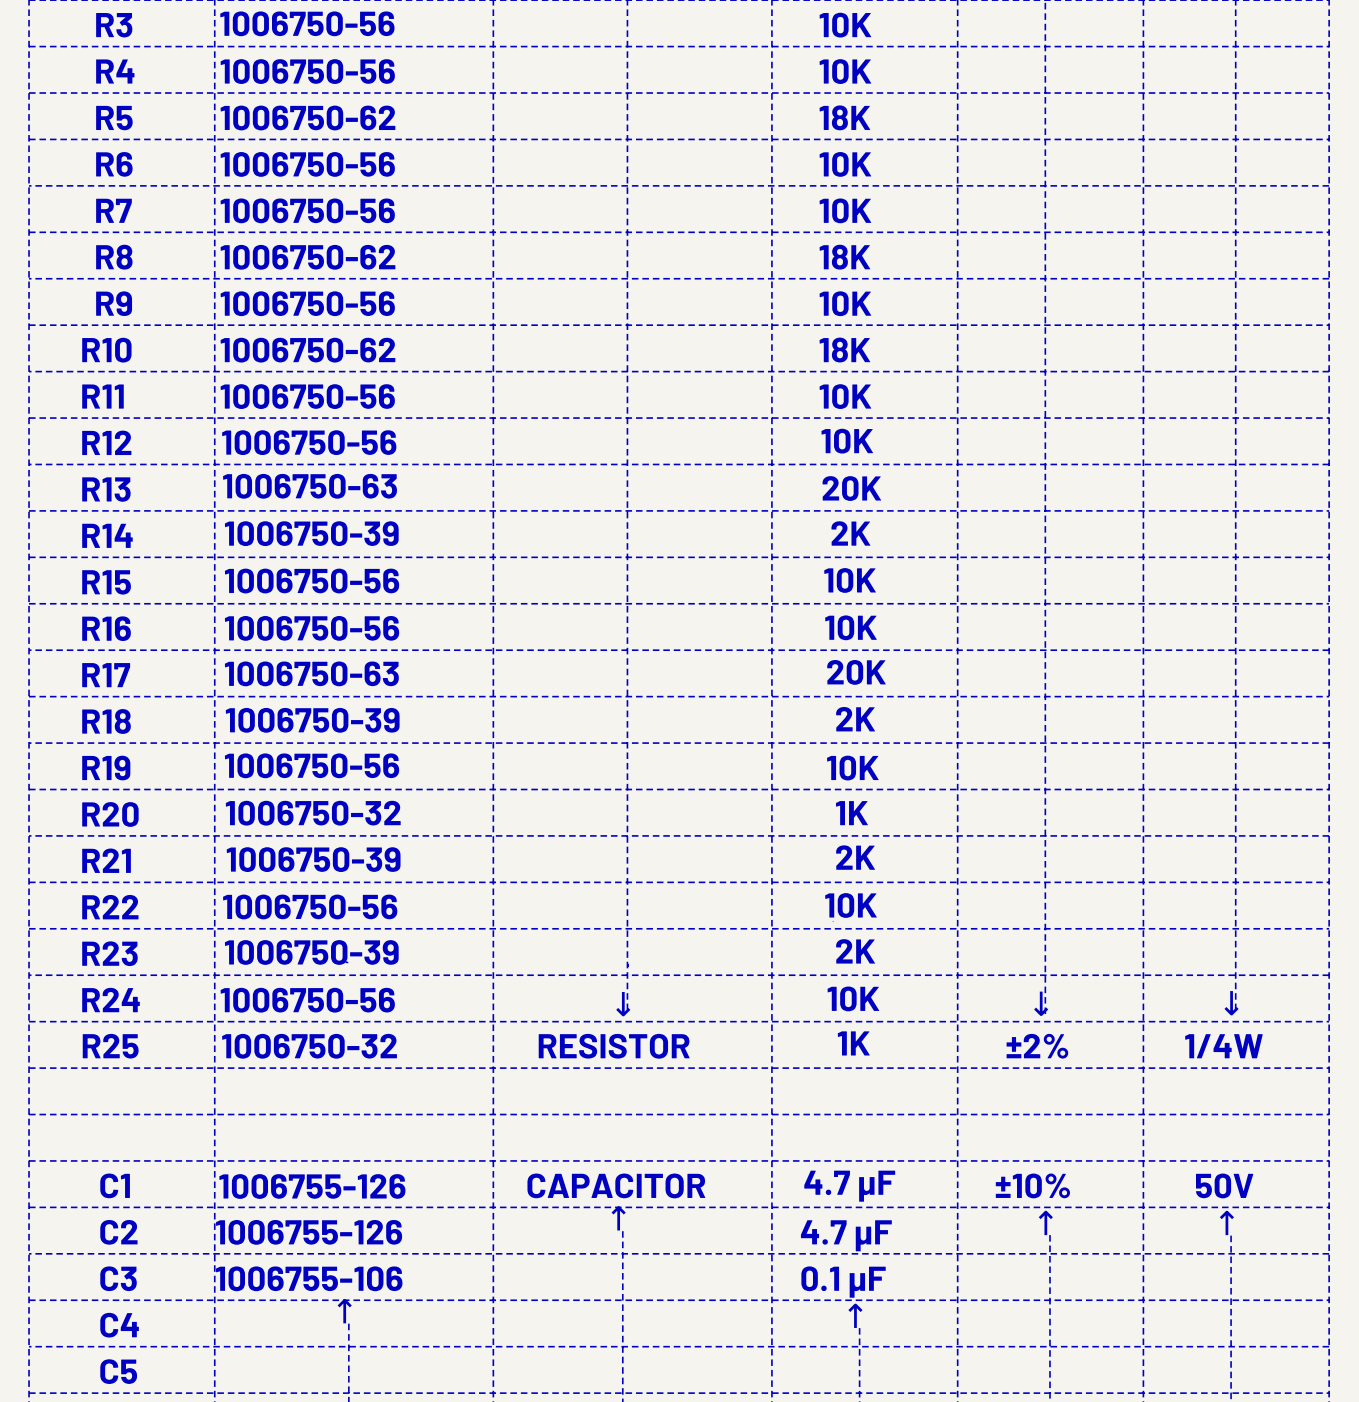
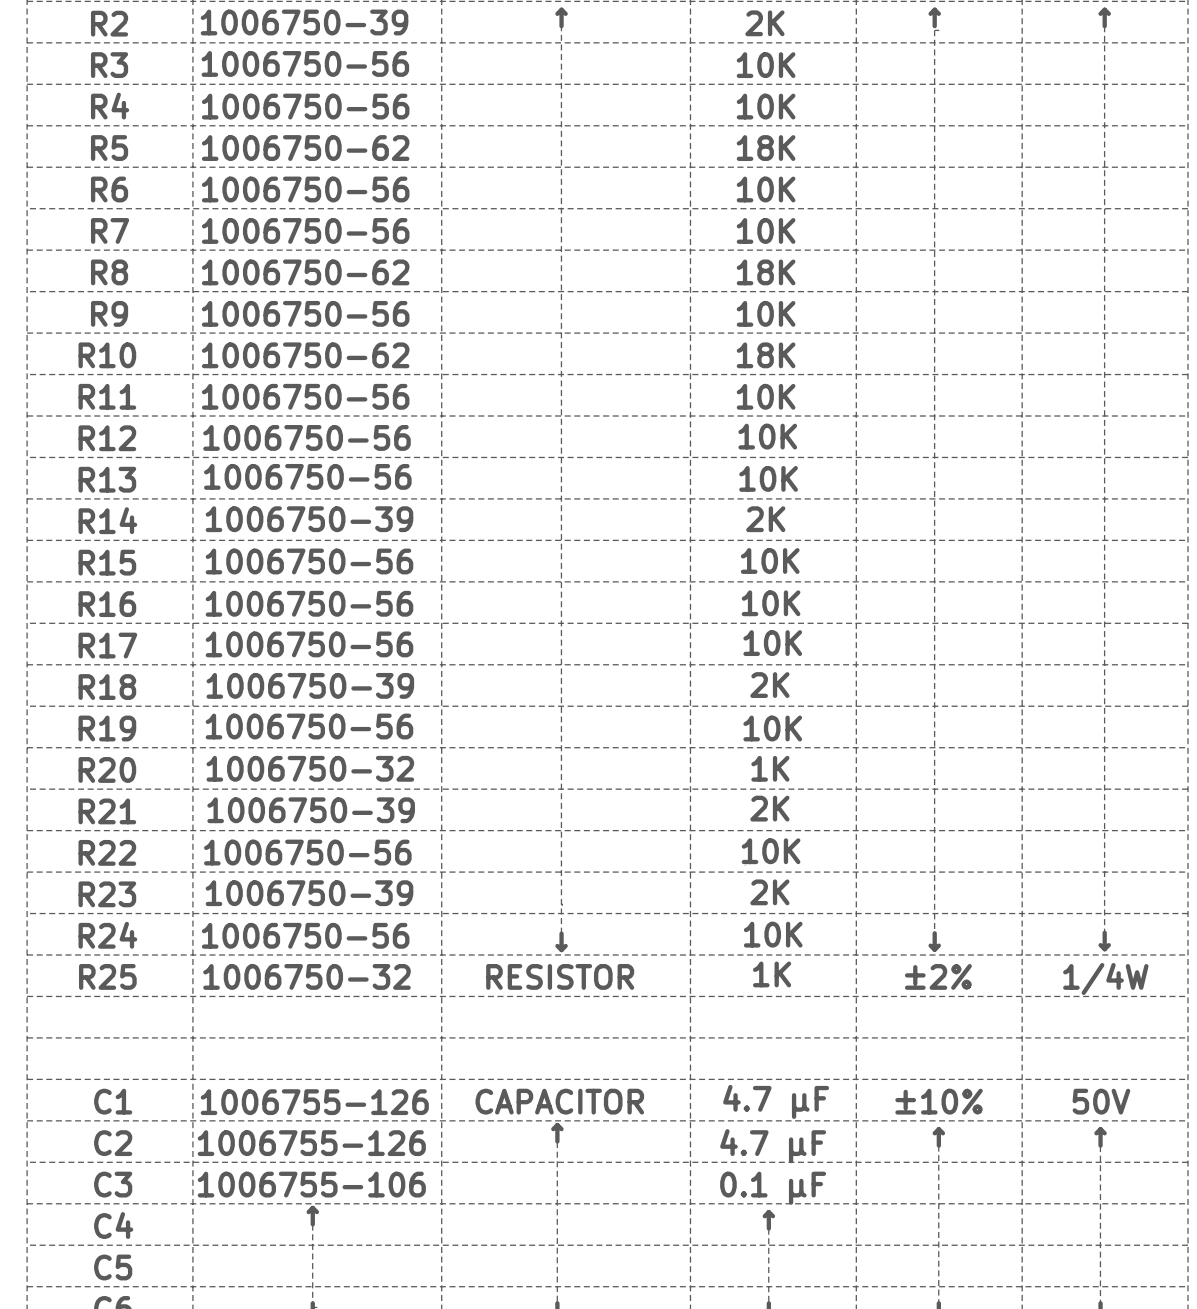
text: 1006750-63 (310, 486) -> 1006750-56 (307, 476)
text: 20K (851, 488) -> 10K (768, 478)
text: 20K (856, 672) -> 10K (772, 643)
text: 1006750-63 (311, 673) -> 1006750-56 (309, 644)

